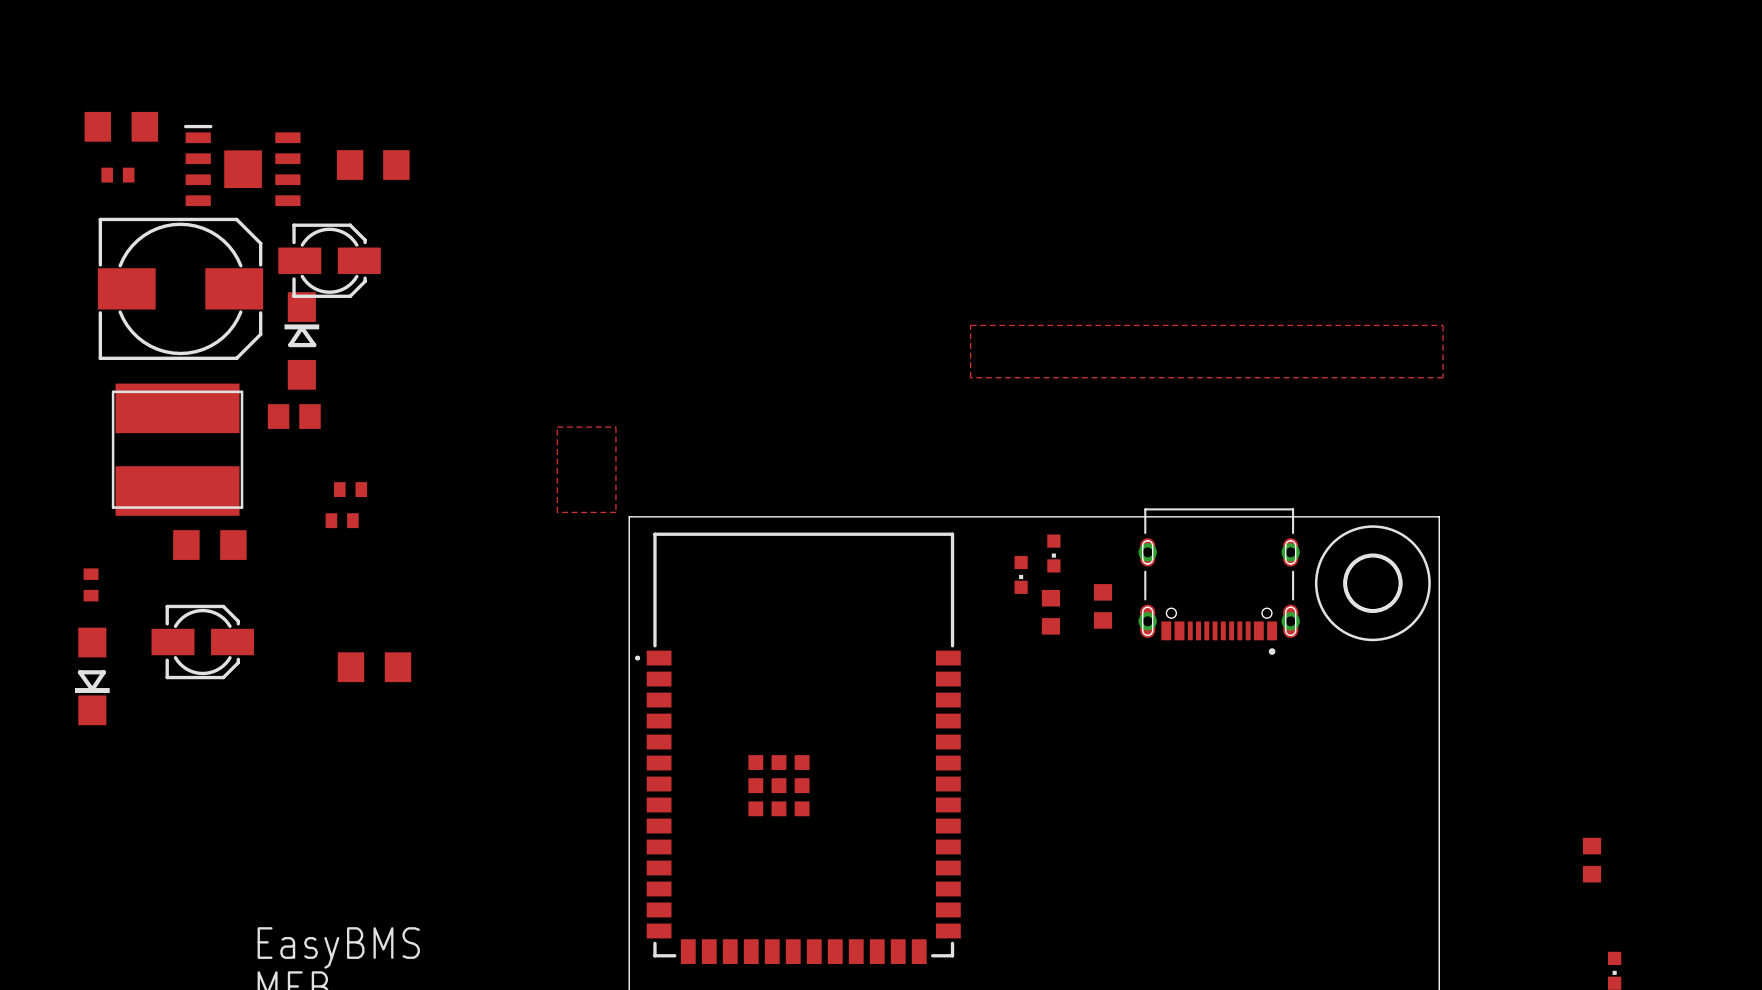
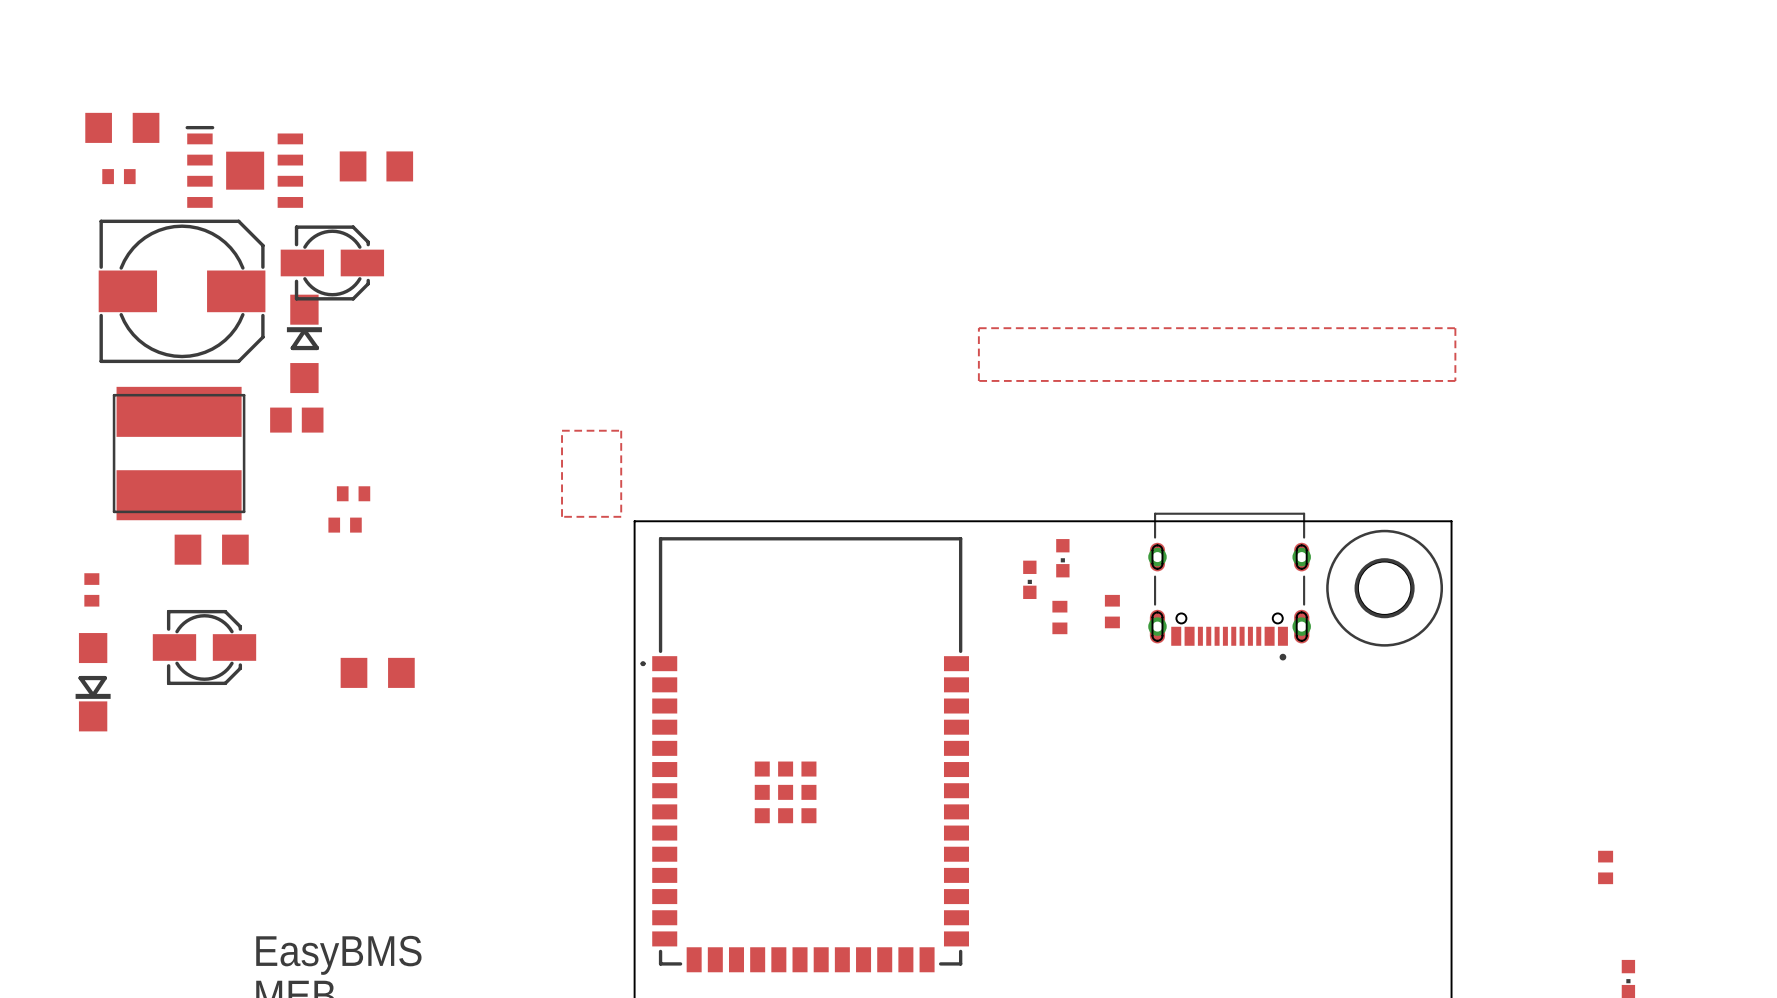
part footprint: [1093, 584, 1113, 629] -> [1104, 594, 1120, 629]
part footprint: [1041, 589, 1061, 635] -> [1052, 600, 1068, 635]
part footprint: [1582, 837, 1602, 883] -> [1598, 850, 1614, 885]

